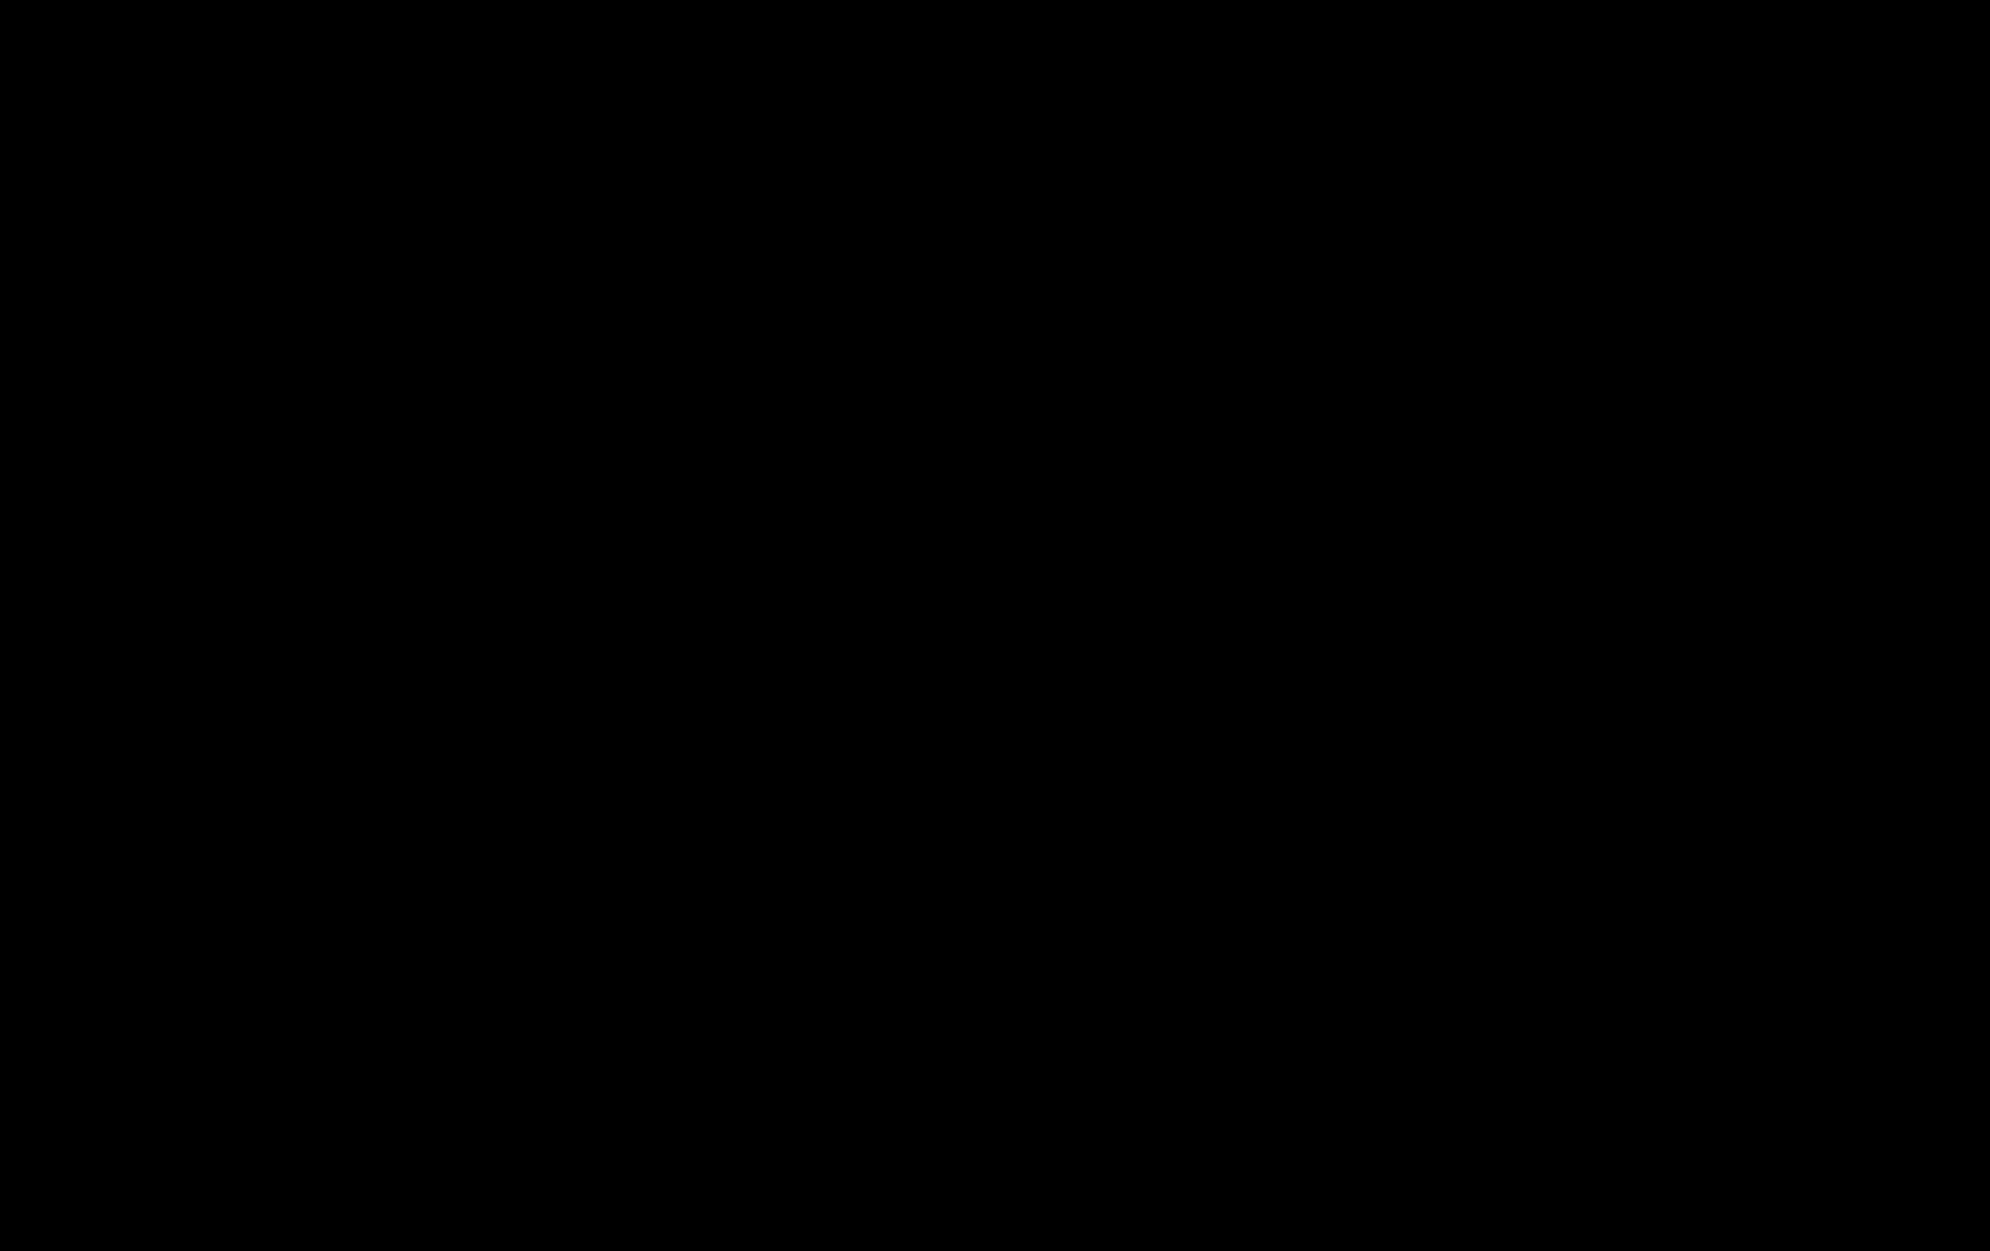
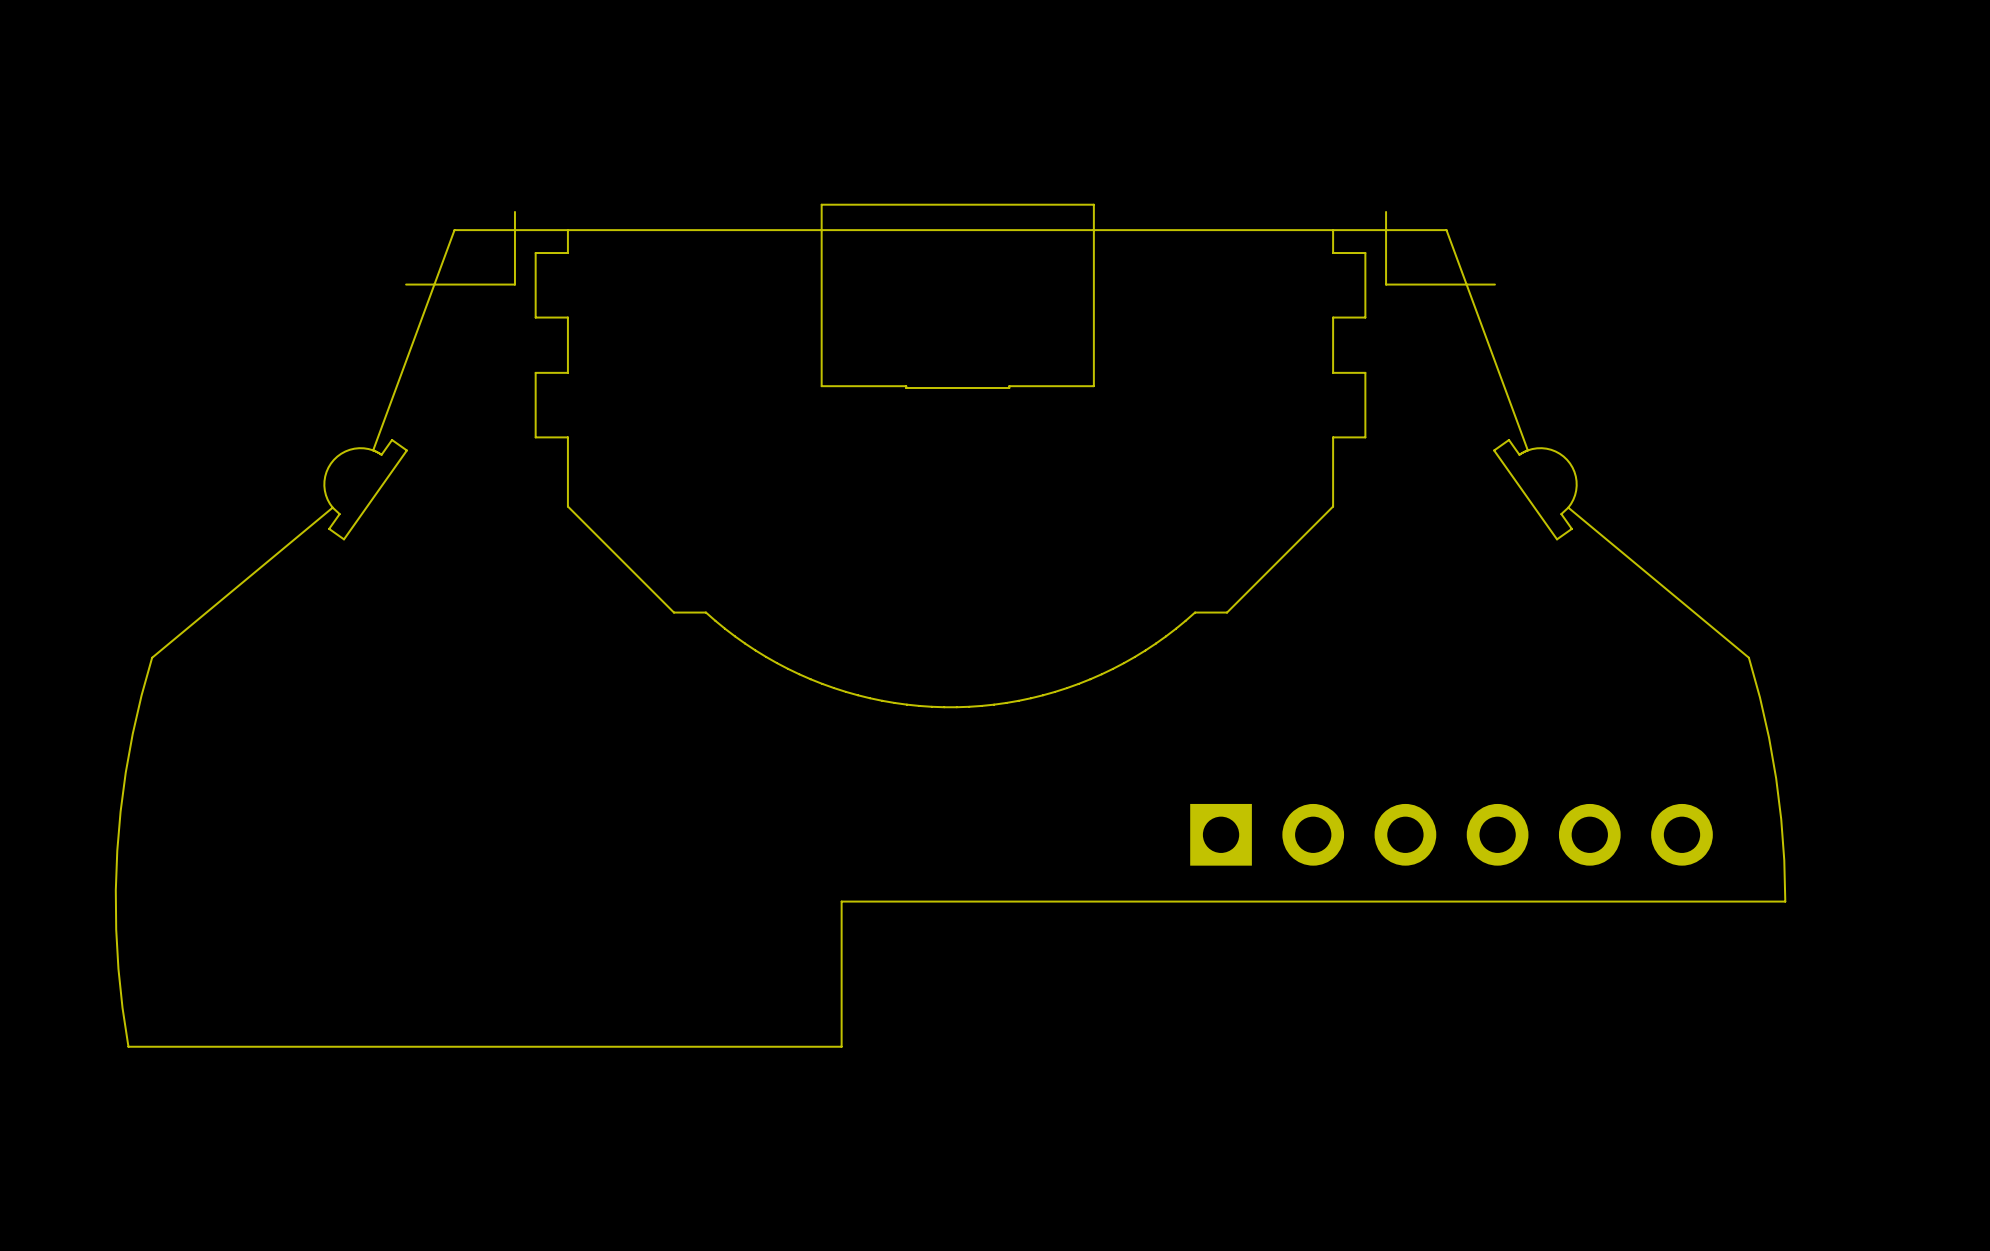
board edge: none -> (1093, 204) (821, 204) (821, 386) (906, 386) (906, 387) (1093, 386) (1093, 204)
board edge: none -> (514, 211) (514, 284) (406, 284)
board edge: none -> (1386, 211) (1386, 284) (1494, 284)
board edge: none -> (1333, 230) (1333, 253) (1365, 253) (1365, 317) (1333, 317) (1333, 372) (1365, 372) (1365, 437) (1333, 437) (1333, 506) (1227, 612) (1195, 612) (1166, 636) (1134, 656) (1101, 674) (1066, 688) (1006, 702) (956, 707) (894, 702) (834, 688) (799, 674) (766, 656) (734, 636) (705, 612) (673, 612) (567, 506) (567, 437) (535, 437) (535, 372) (567, 372) (567, 317) (535, 317) (535, 253) (567, 253) (567, 230)
board edge: none -> (373, 450) (381, 454) (392, 439) (406, 450) (344, 539) (329, 528) (339, 514) (332, 507)
board edge: none -> (373, 450) (359, 448) (349, 449) (337, 456) (330, 463) (326, 471) (324, 485) (325, 495) (332, 507)
board edge: none -> (1527, 450) (1446, 230) (454, 230) (373, 450)
board edge: none -> (1527, 450) (1519, 454) (1508, 439) (1494, 450) (1557, 539) (1571, 528) (1561, 514) (1568, 507)
board edge: none -> (1527, 450) (1541, 448) (1551, 449) (1563, 456) (1570, 463) (1575, 476) (1576, 485) (1573, 499) (1568, 507)
board edge: none -> (1568, 507) (1748, 657) (1759, 697) (1776, 778) (1781, 819) (1785, 901) (841, 901) (841, 1046) (128, 1046) (118, 968) (116, 929) (117, 850) (120, 811) (132, 733) (152, 657) (332, 507)
part: none -> (1451, 834)

